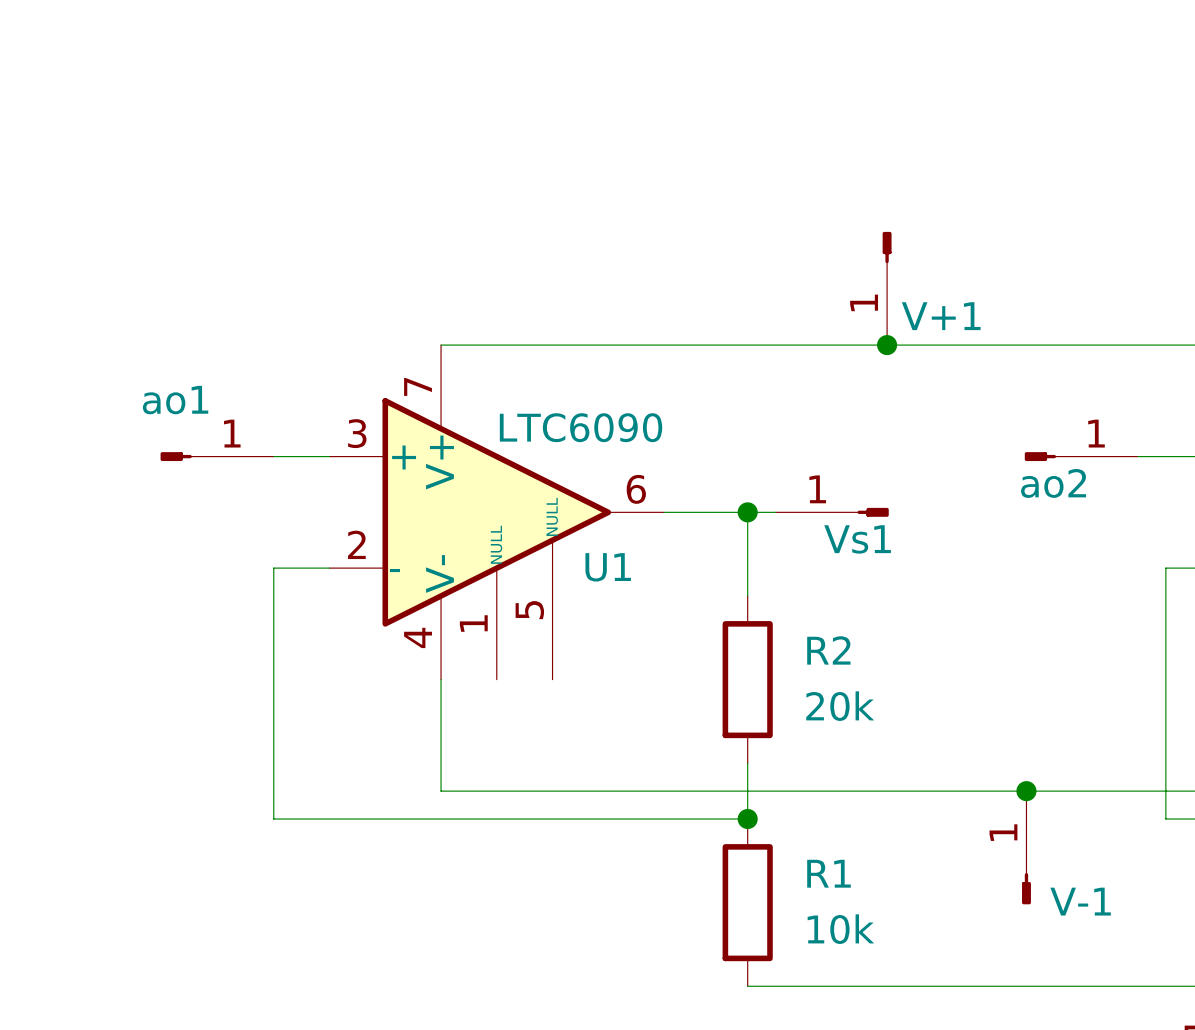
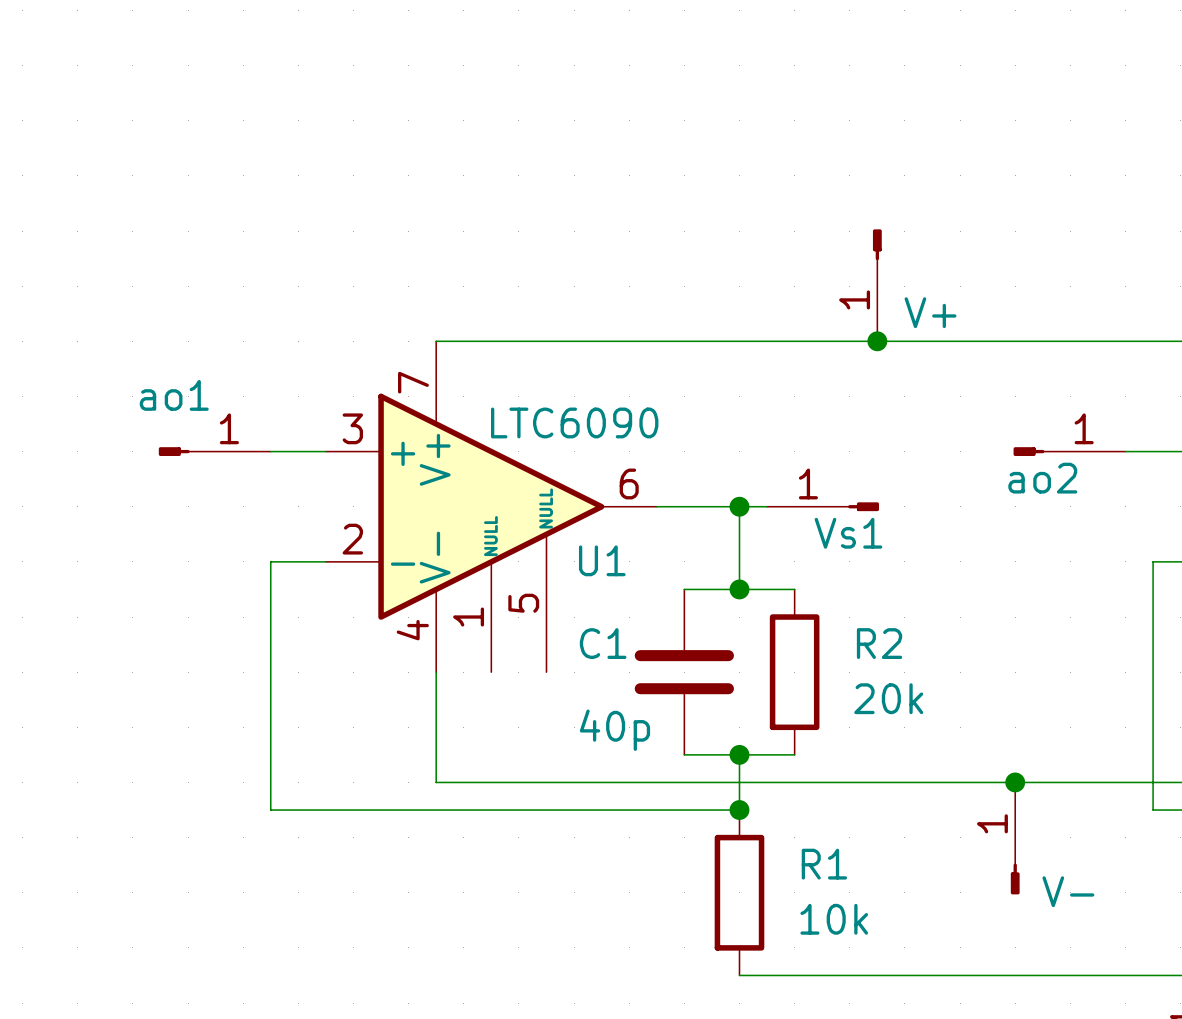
V+1 name: V+1 (941, 316) -> V+ (930, 312)
wire: none -> (684, 589) (794, 589)
junction: none -> (739, 589)
C1: none -> 40p (684, 672)
R2 position: (747, 679) -> (794, 672)
wire: none -> (684, 754) (794, 754)
junction: none -> (739, 754)
V-1 name: V-1 (1080, 901) -> V- (1068, 891)

